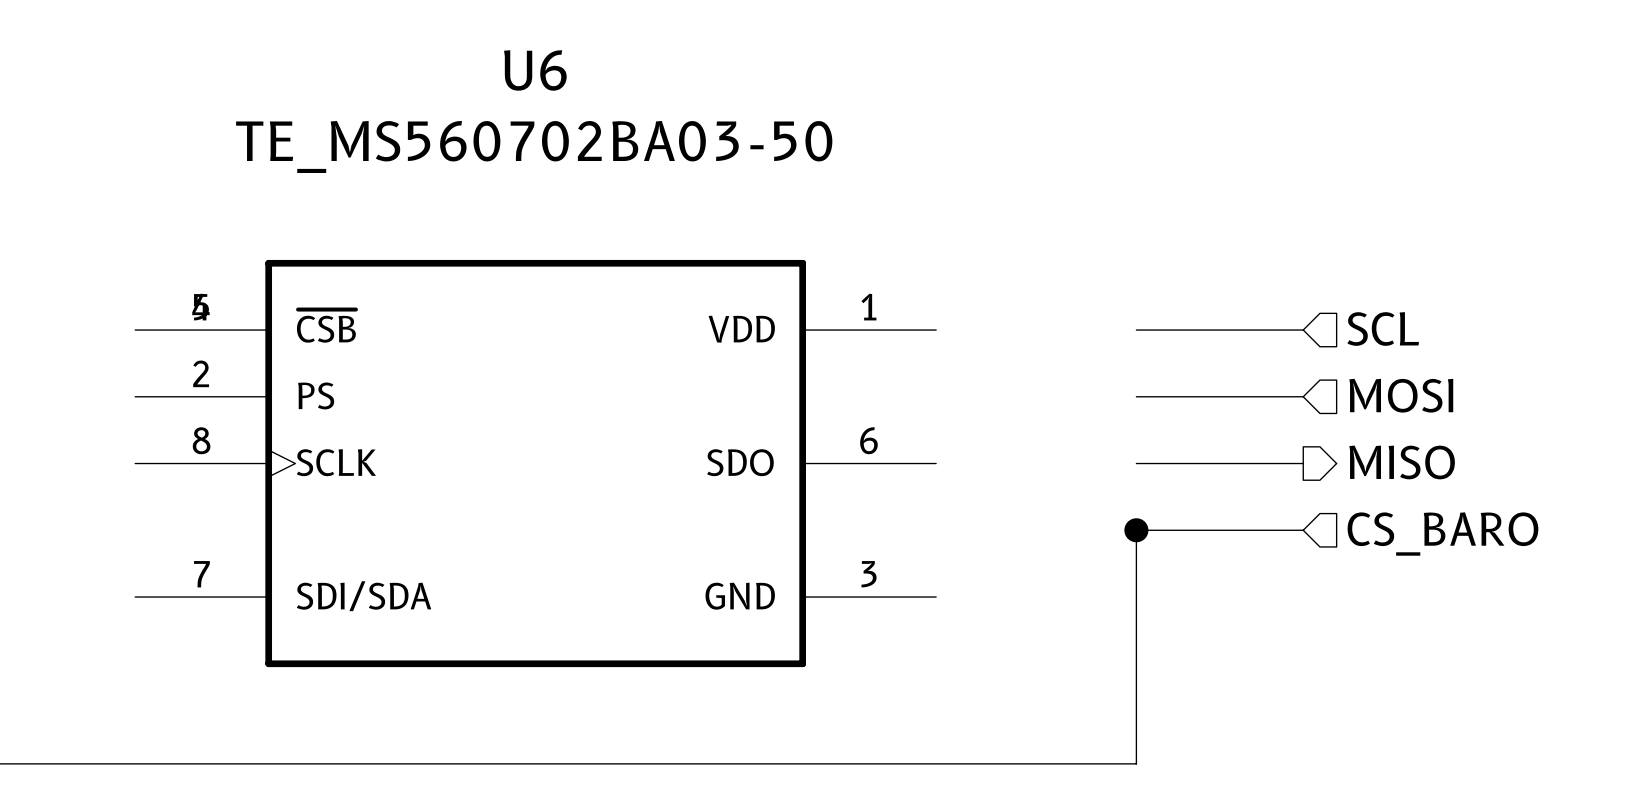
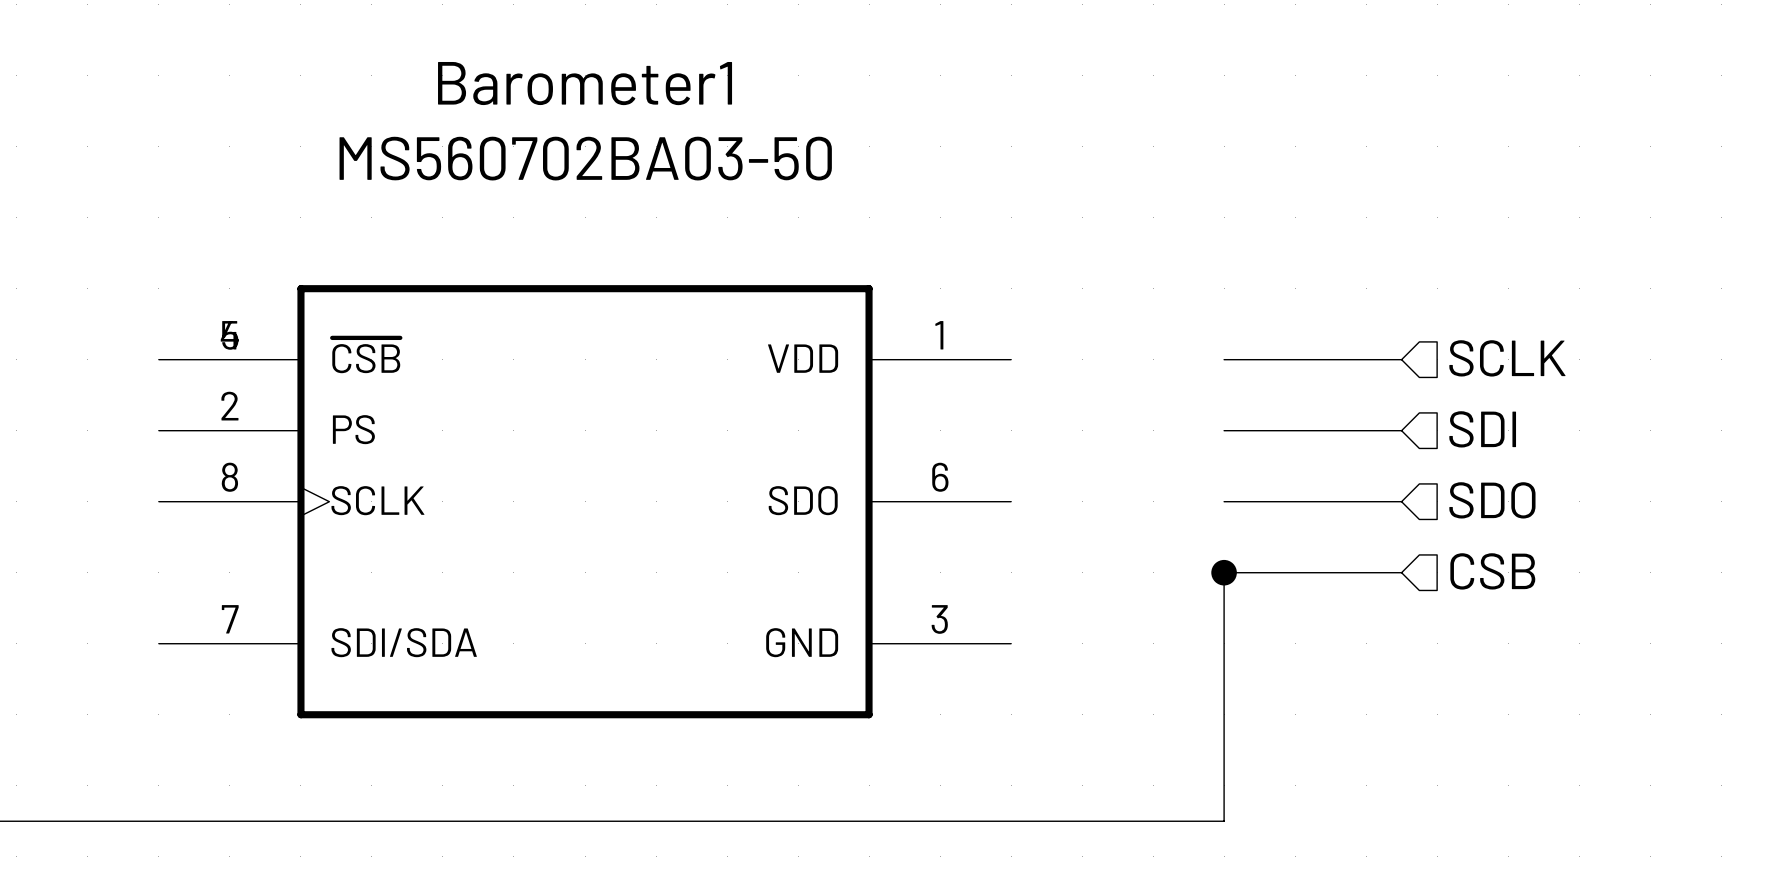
U6 name: U6 (535, 70) -> Barometer1 (585, 83)
U6 value: TE_MS560702BA03-50 (534, 146) -> MS560702BA03-50 (585, 158)
hierarchical label: SCL (1383, 328) -> SCLK (1507, 358)
hierarchical label: MOSI (1401, 395) -> SDI (1482, 429)
hierarchical label shape: output (1402, 462) -> input (1492, 500)
hierarchical label: MISO (1402, 462) -> SDO (1492, 500)
hierarchical label: CS_BARO (1442, 534) -> CSB (1492, 571)

